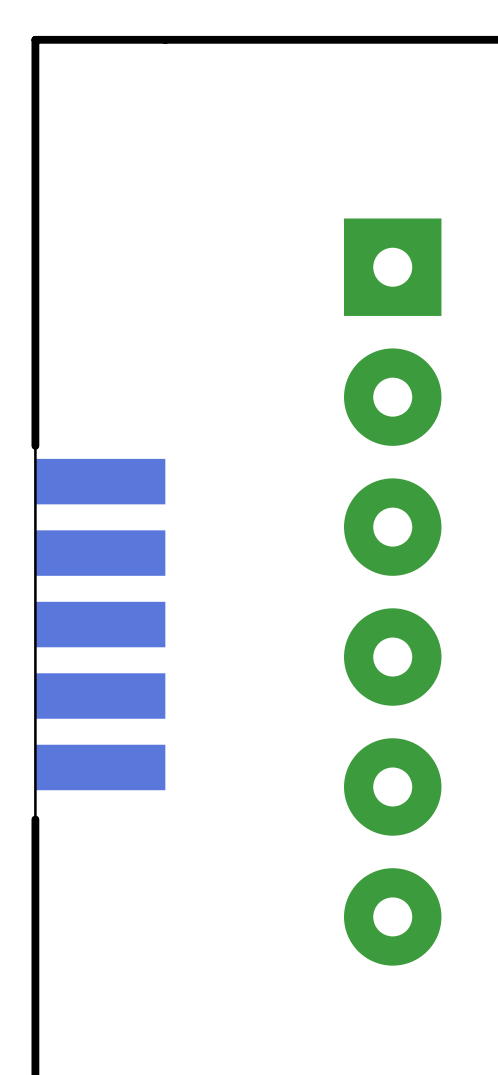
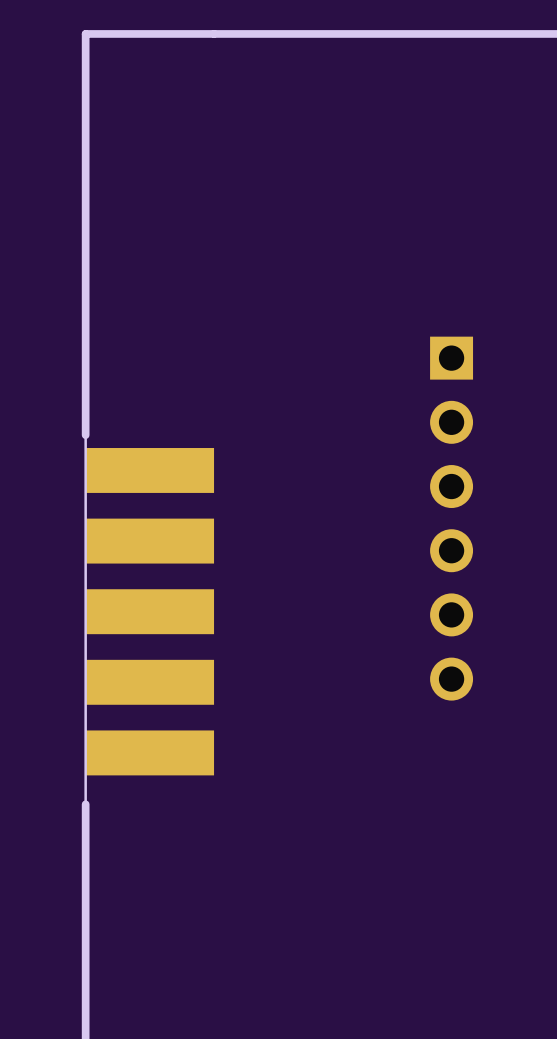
part: none -> (451, 518)
part: (392, 592) -> none

